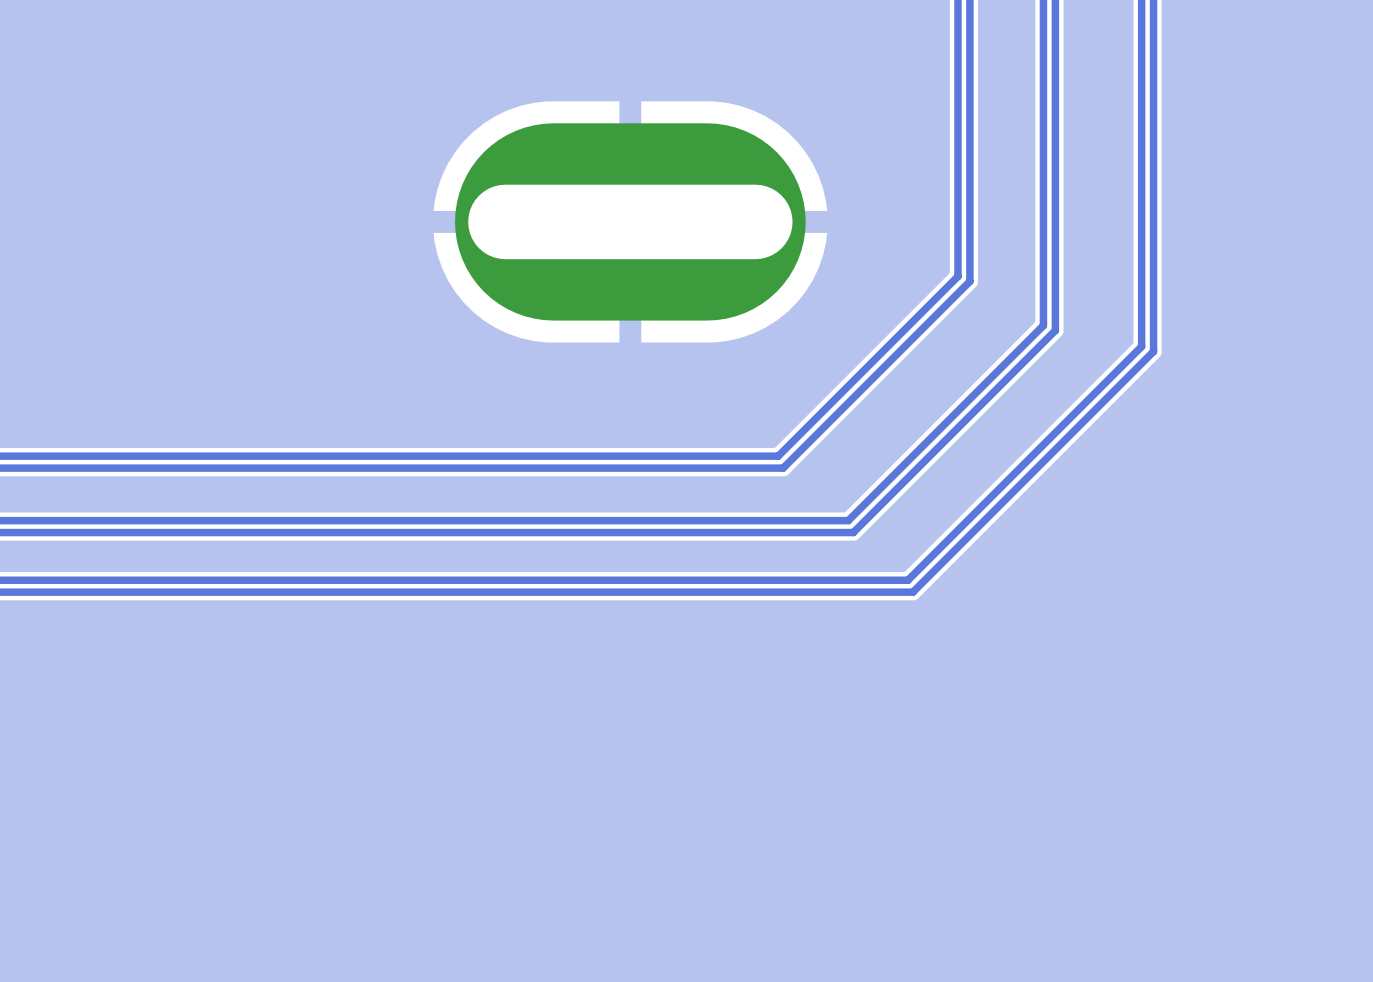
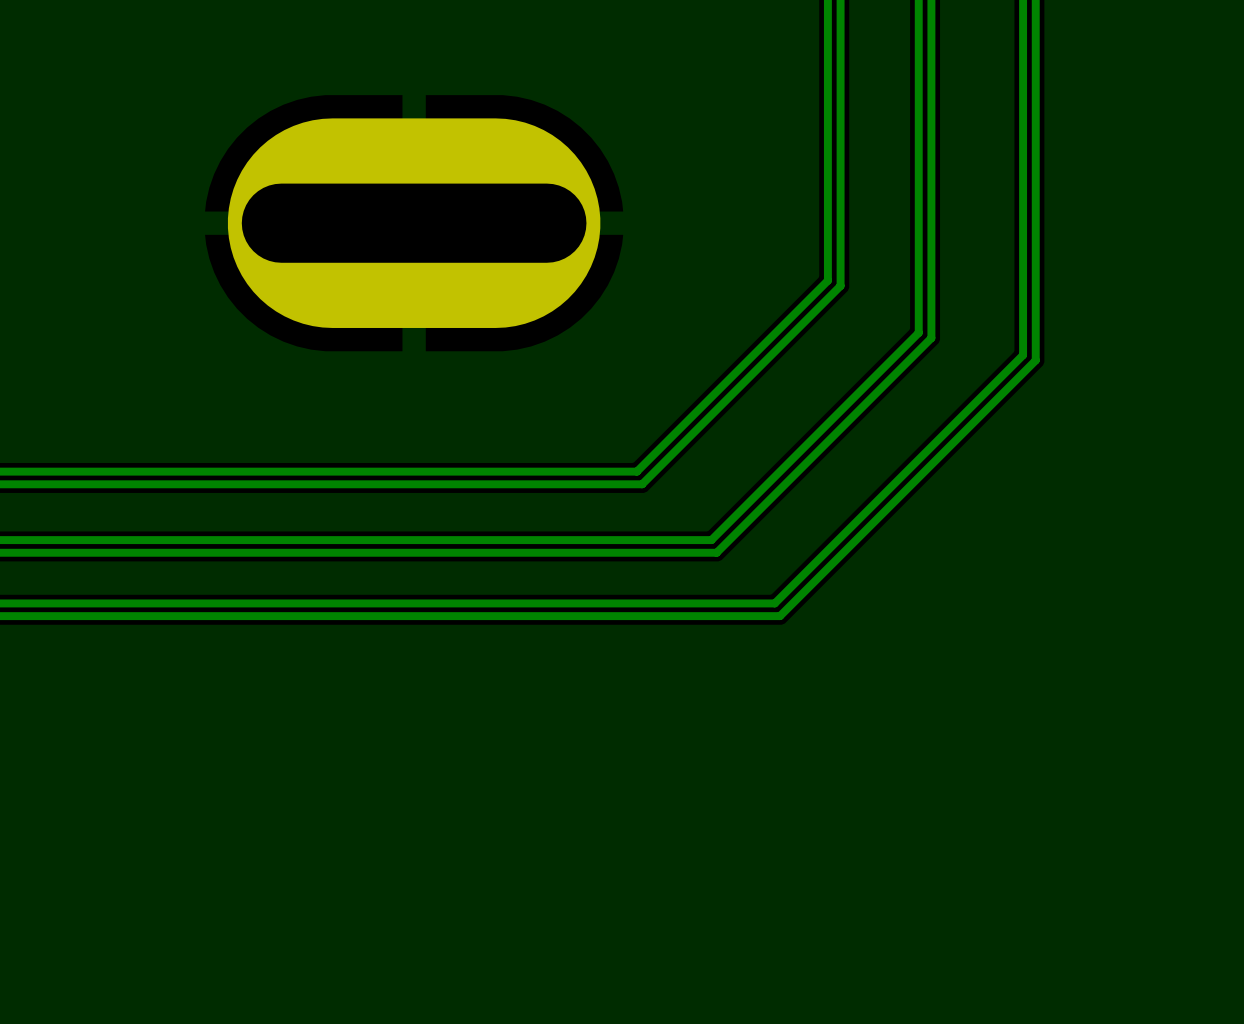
part position: (630, 221) -> (414, 223)

